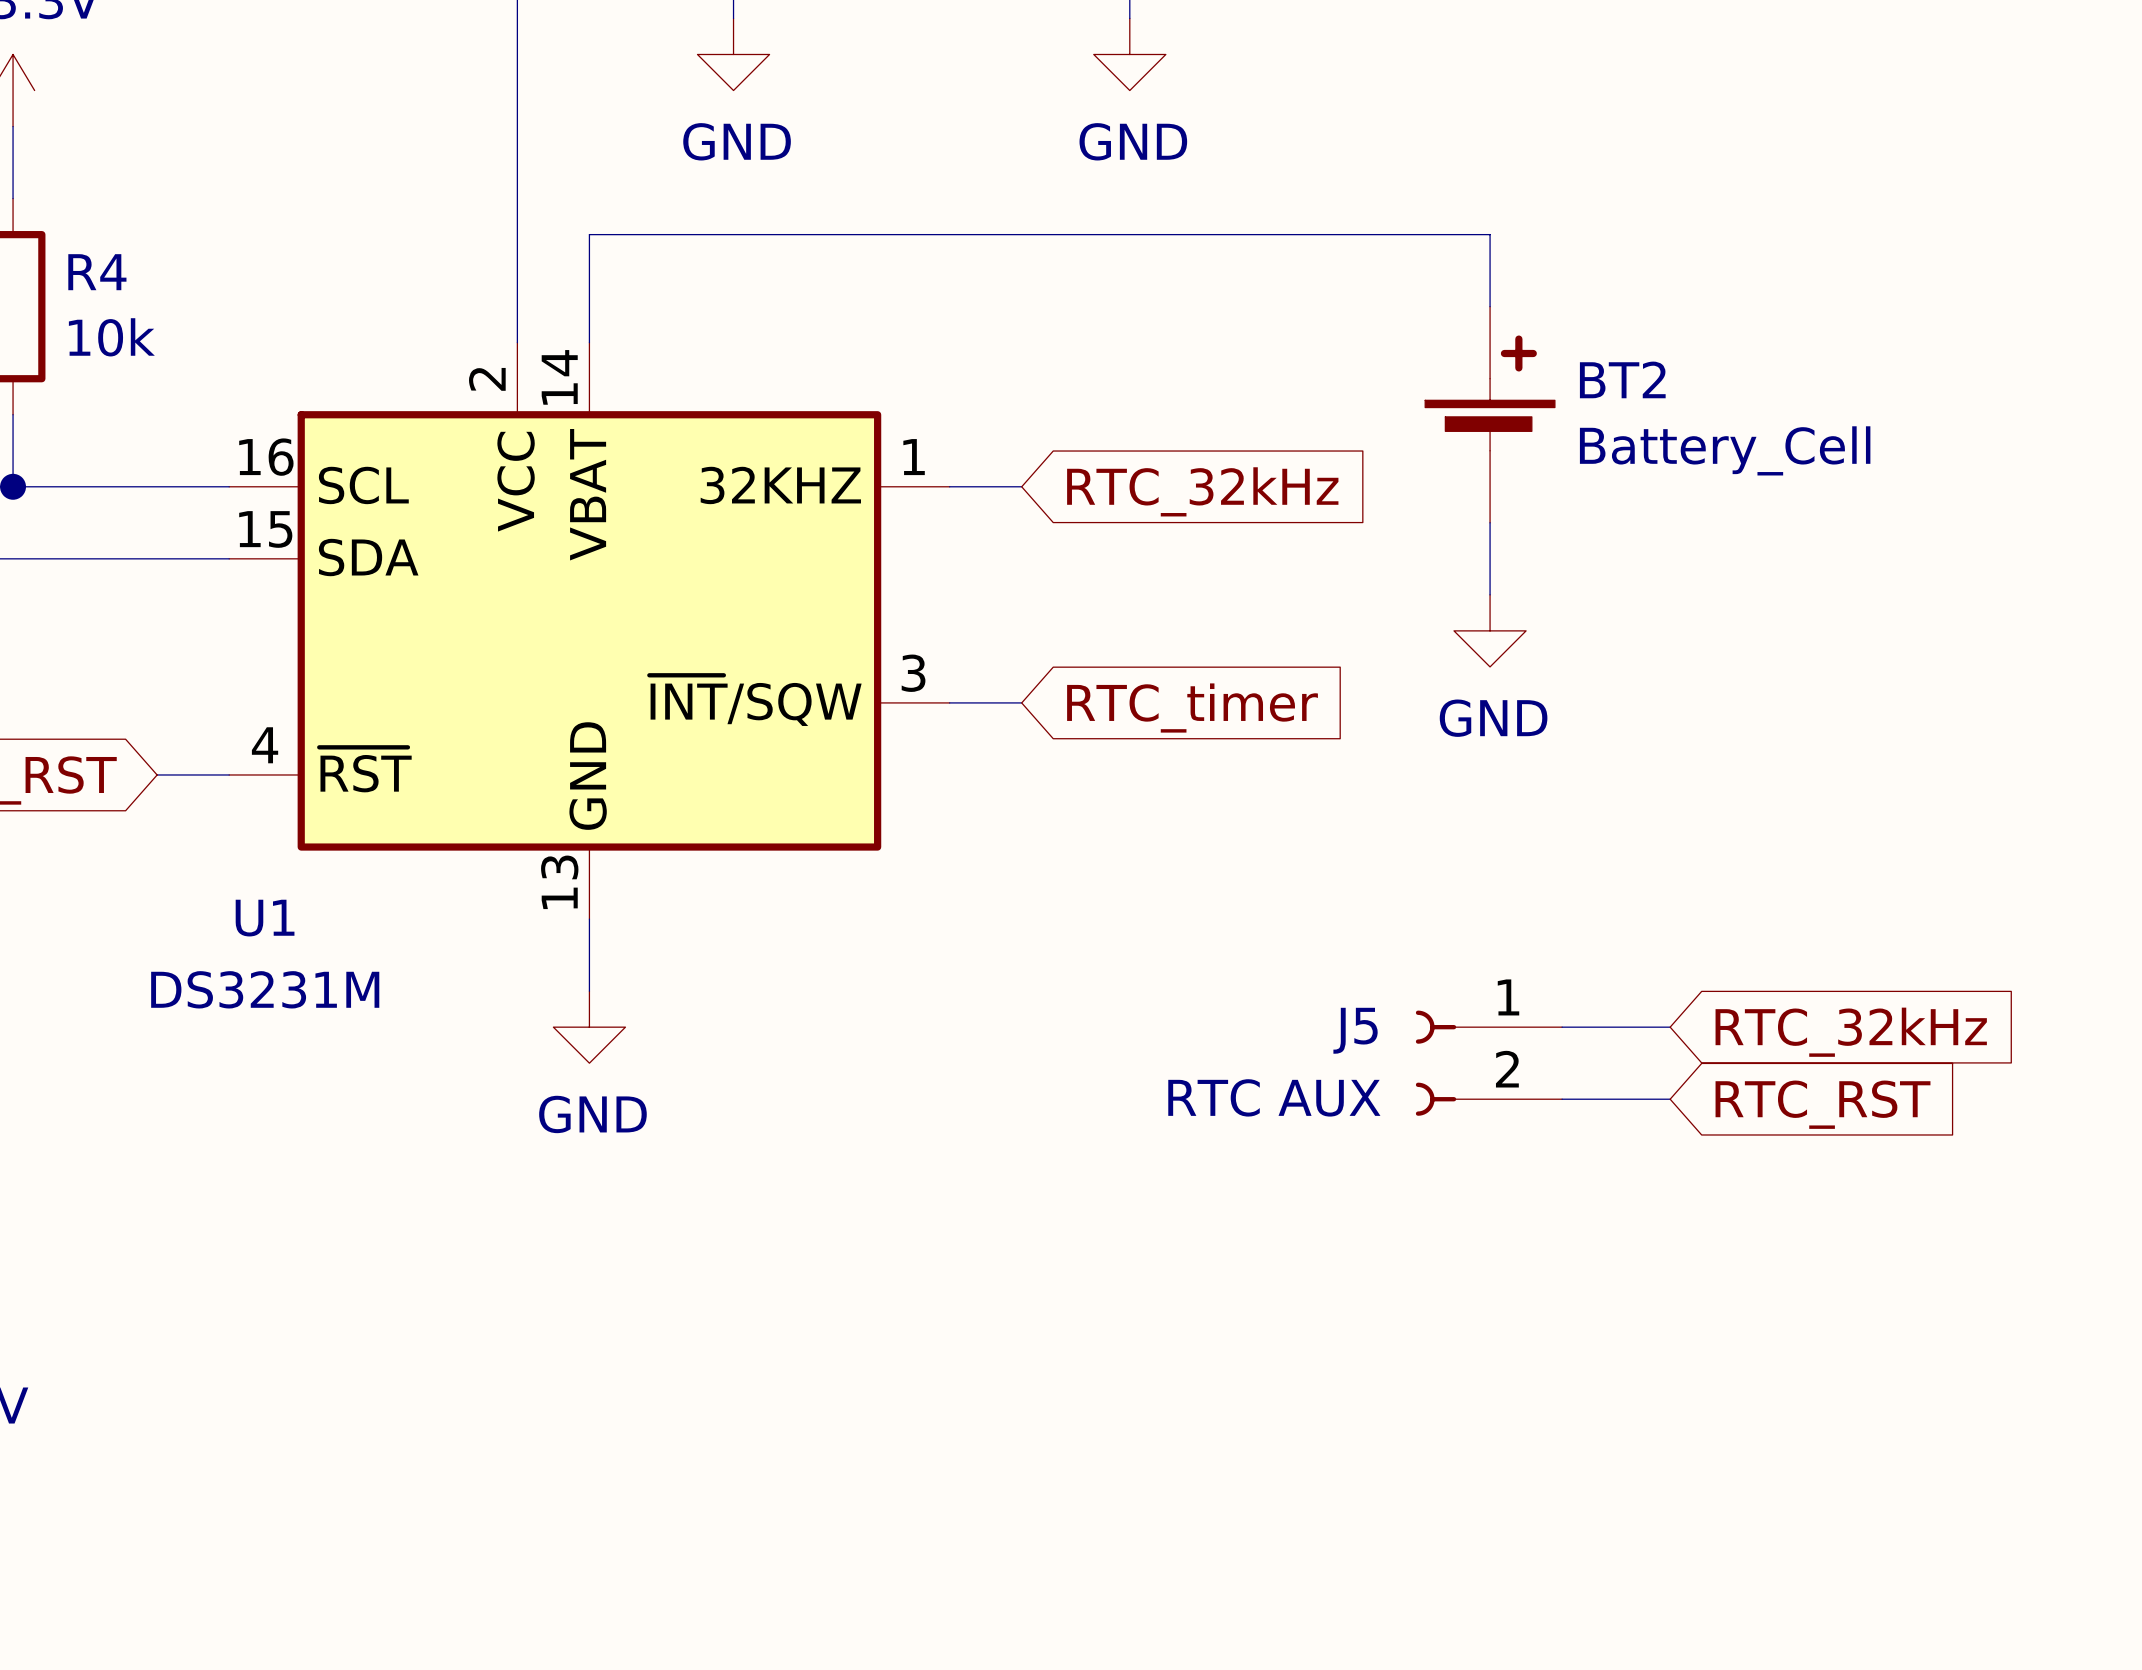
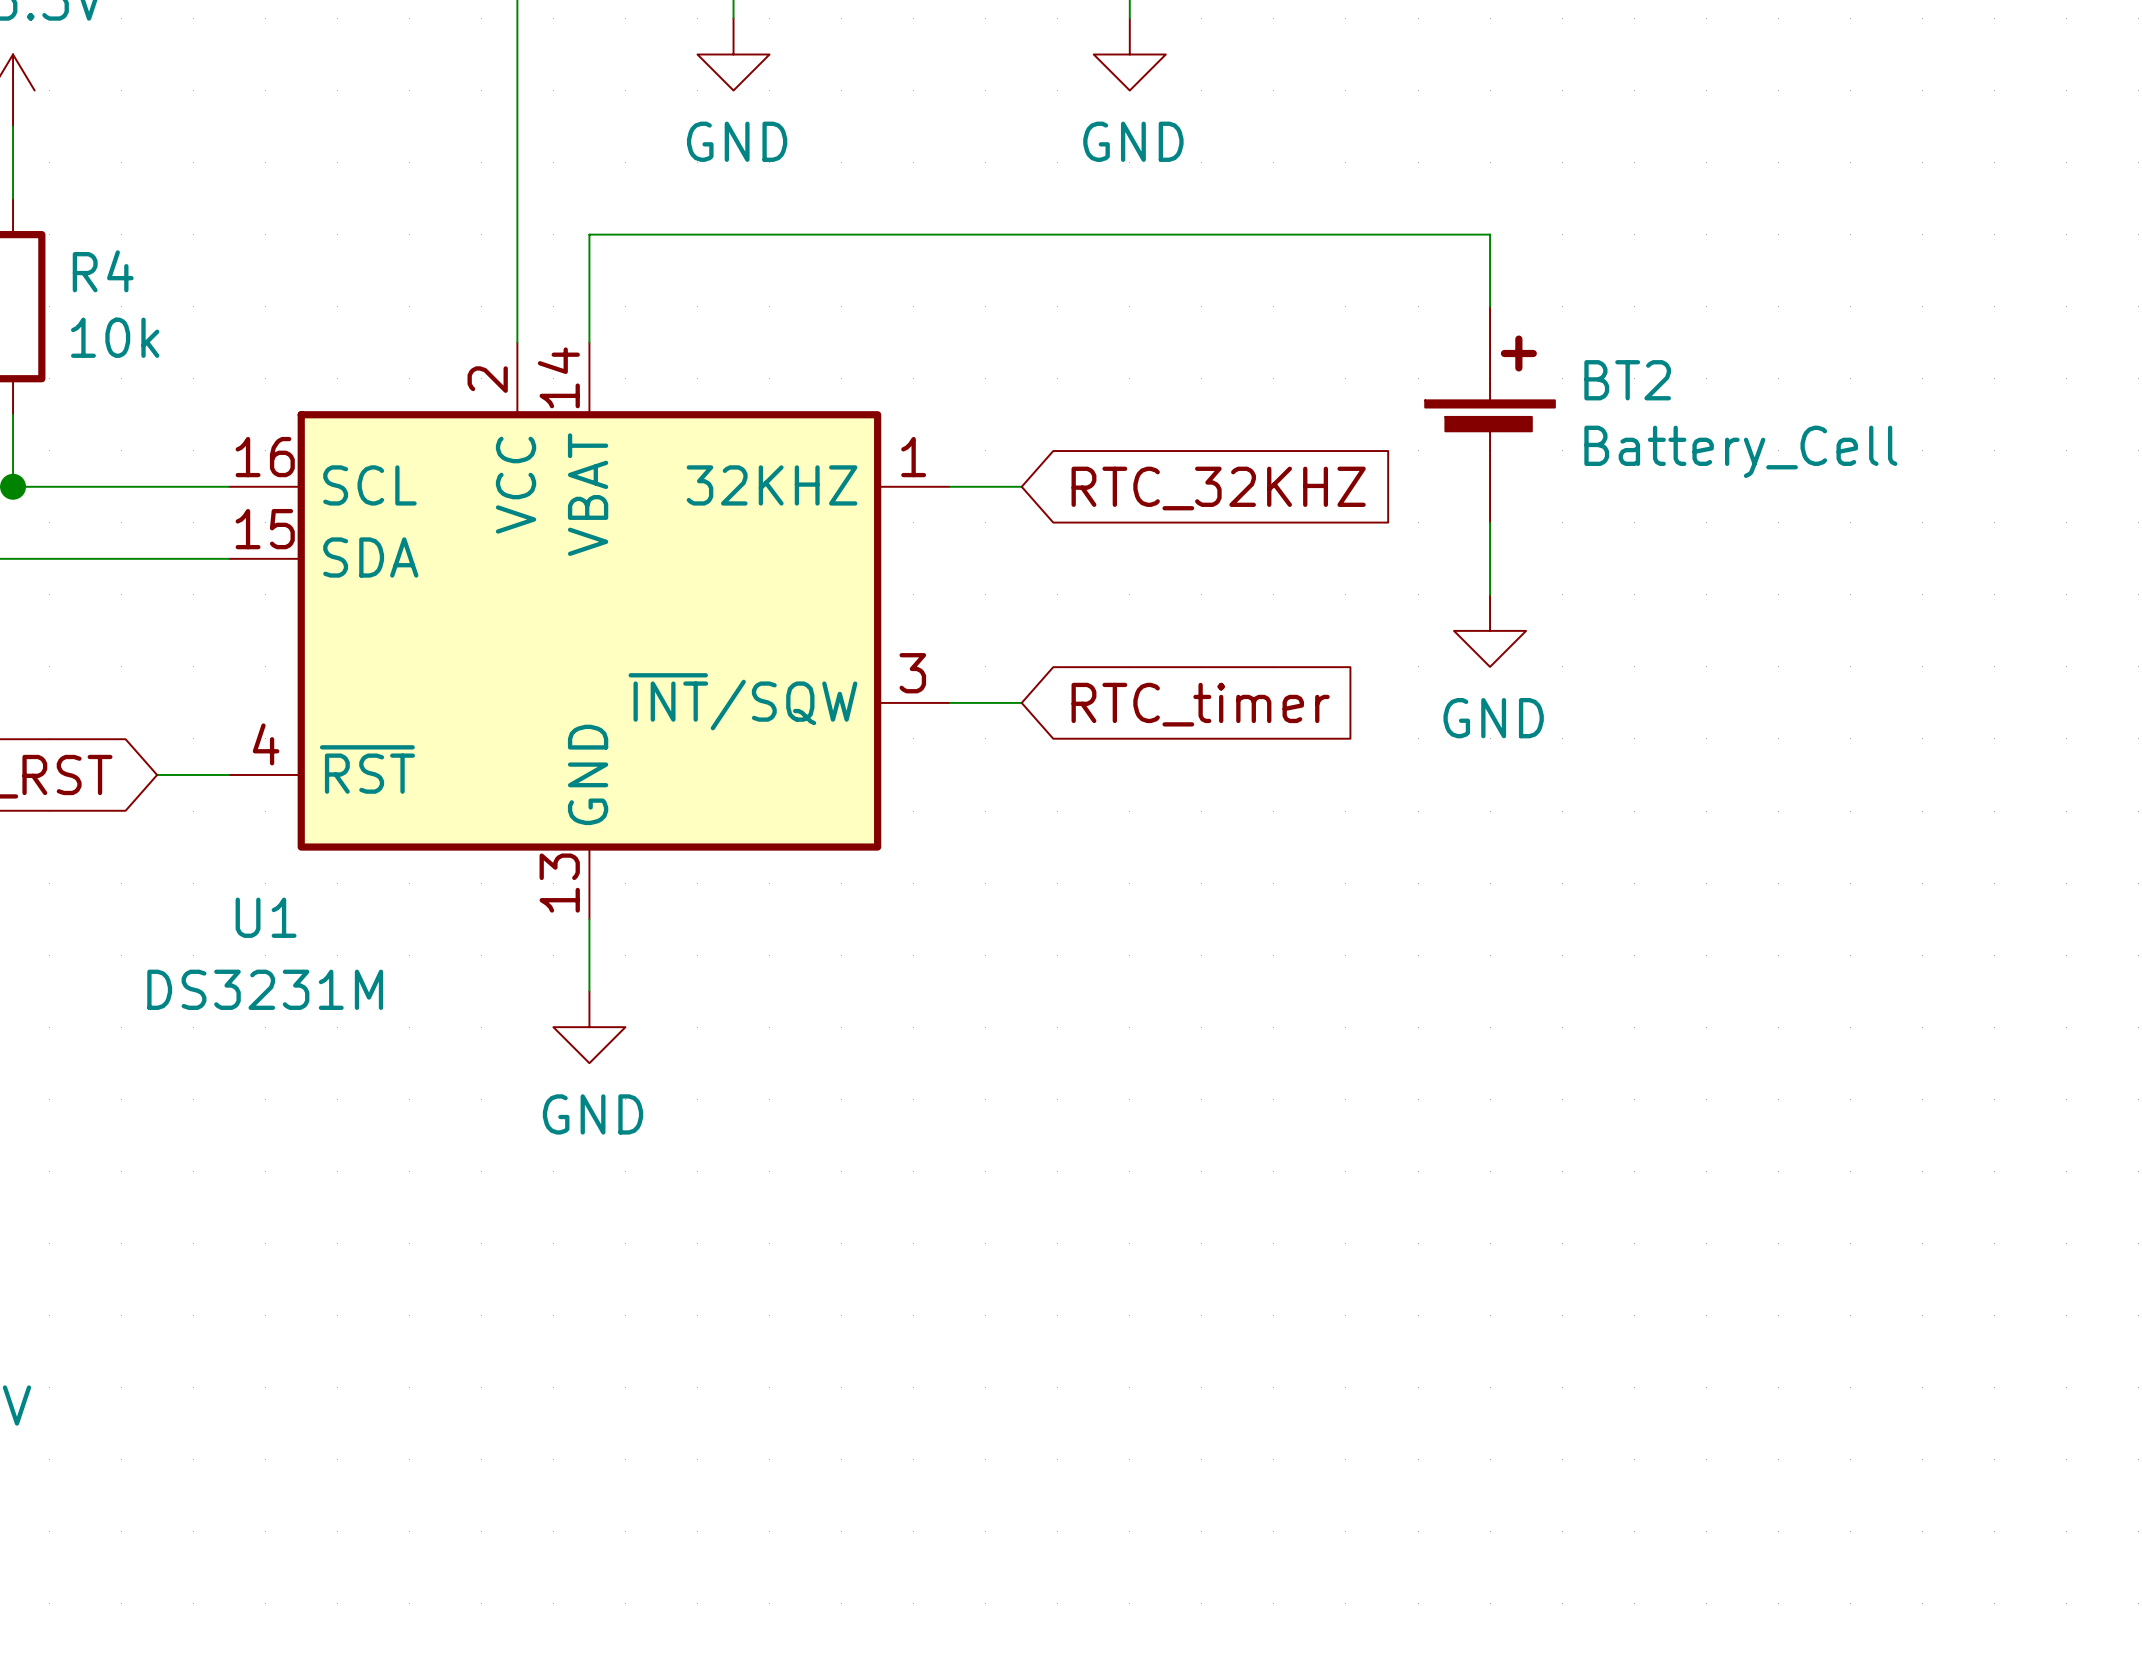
global label: RTC_32kHz (1202, 491) -> RTC_32KHZ (1218, 488)
wire: (1562, 1027) (1670, 1027) -> none
global label: RTC_32kHz (1851, 1032) -> none
J5: RTC AUX (1488, 1063) -> none
wire: (1562, 1099) (1670, 1099) -> none
global label: RTC_RST (1823, 1104) -> none

